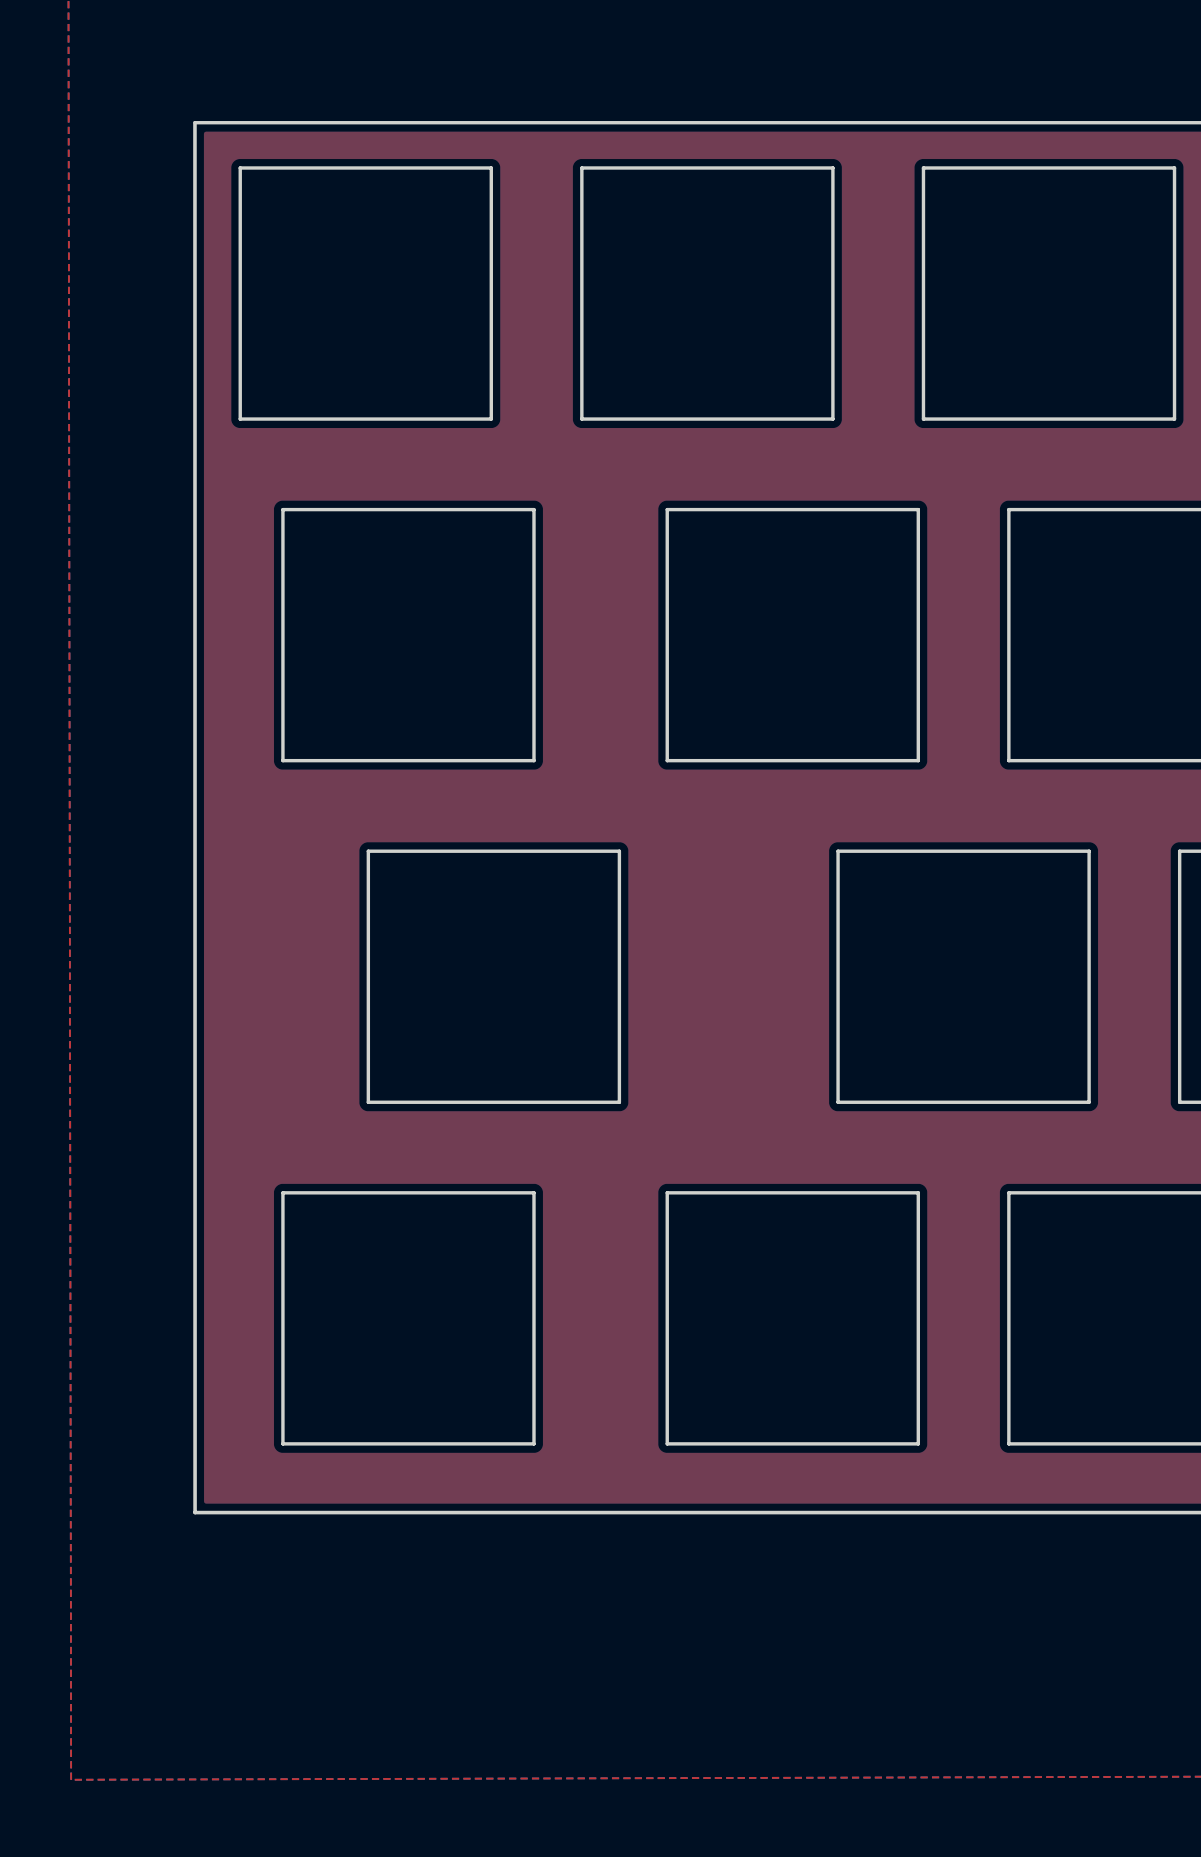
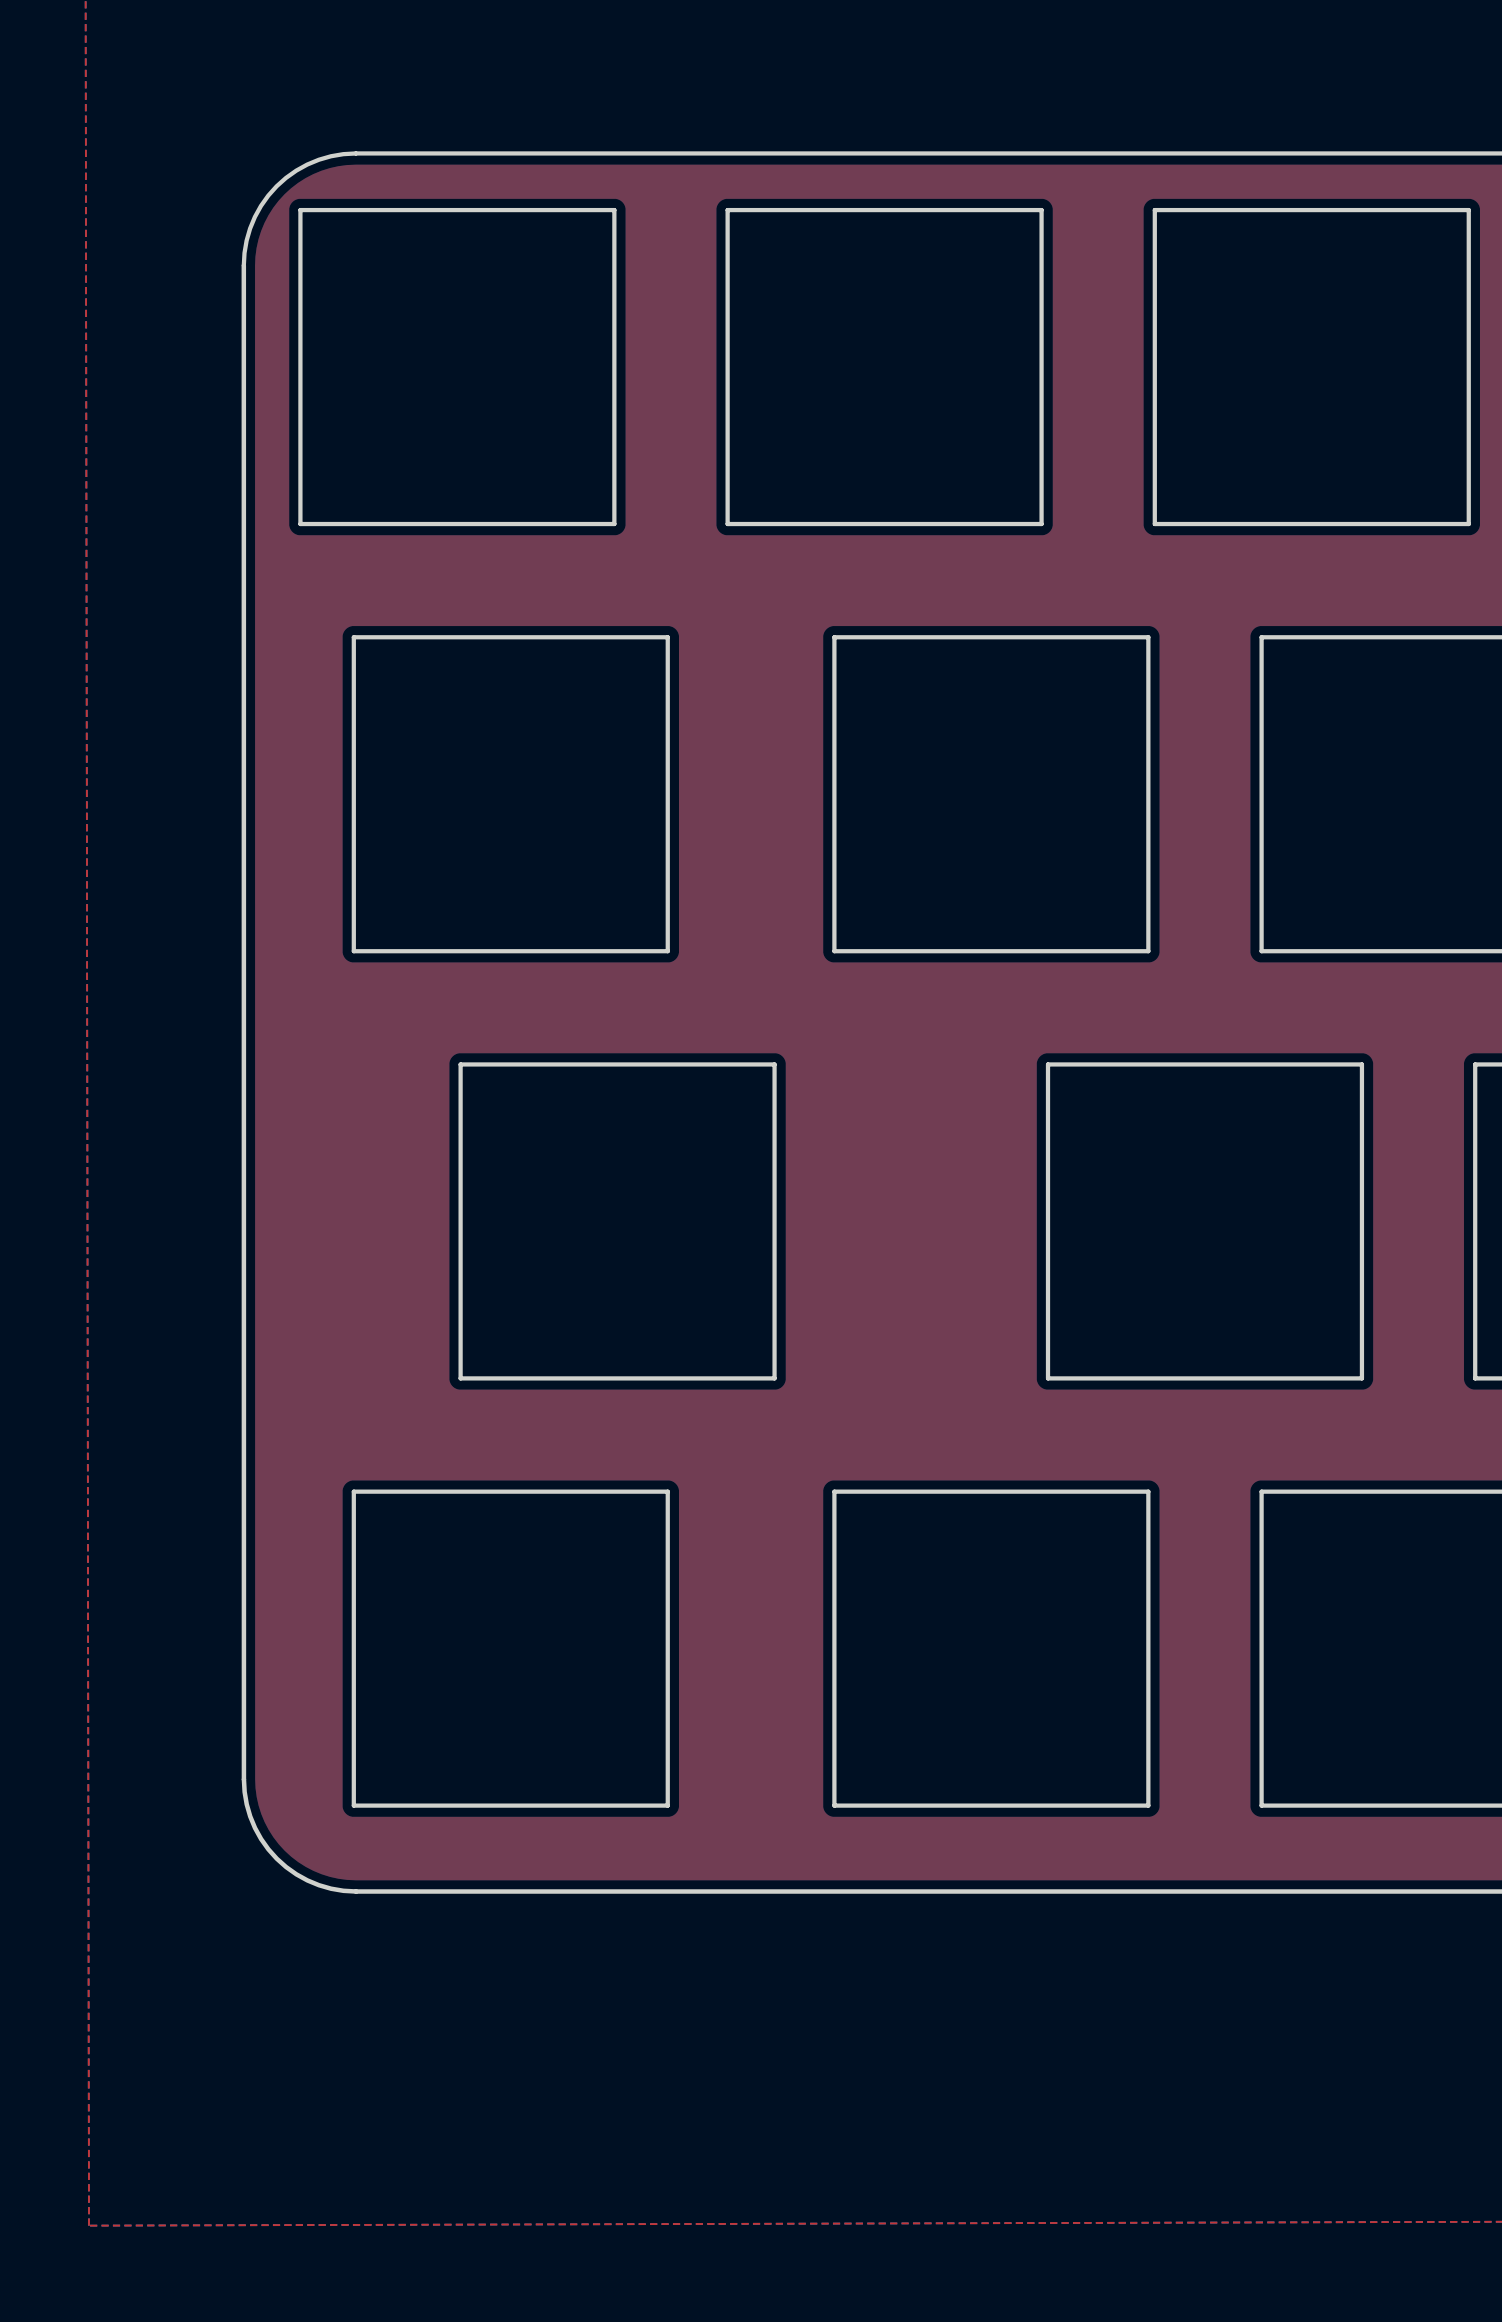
board edge: (284, 122) (194, 122) (194, 212) -> (355, 153) (330, 156) (307, 164) (276, 186) (254, 216) (246, 240) (243, 265)
board edge: (195, 1422) (195, 1512) (284, 1512) -> (243, 1779) (250, 1816) (261, 1839) (276, 1858) (296, 1874) (319, 1885) (356, 1891)

